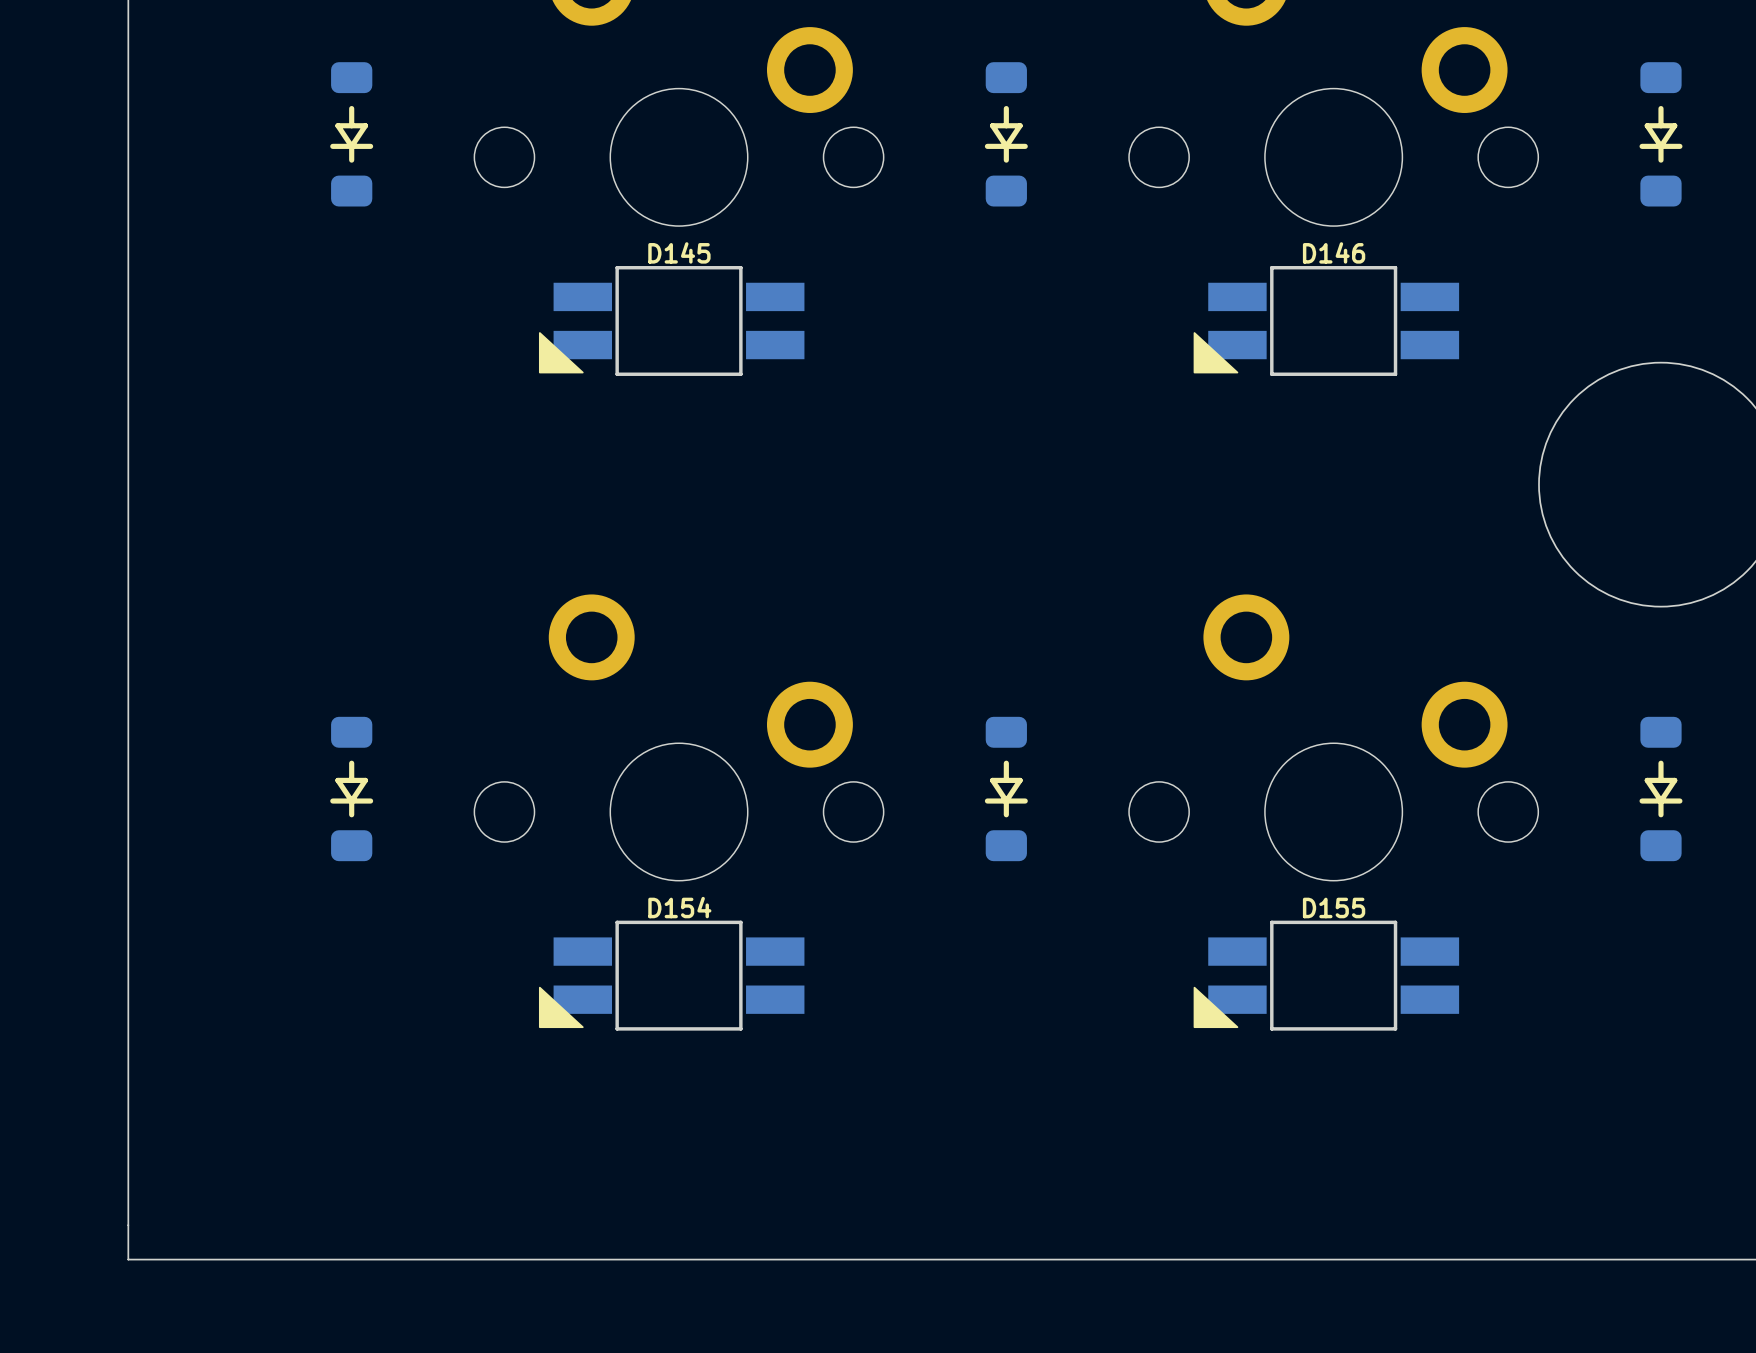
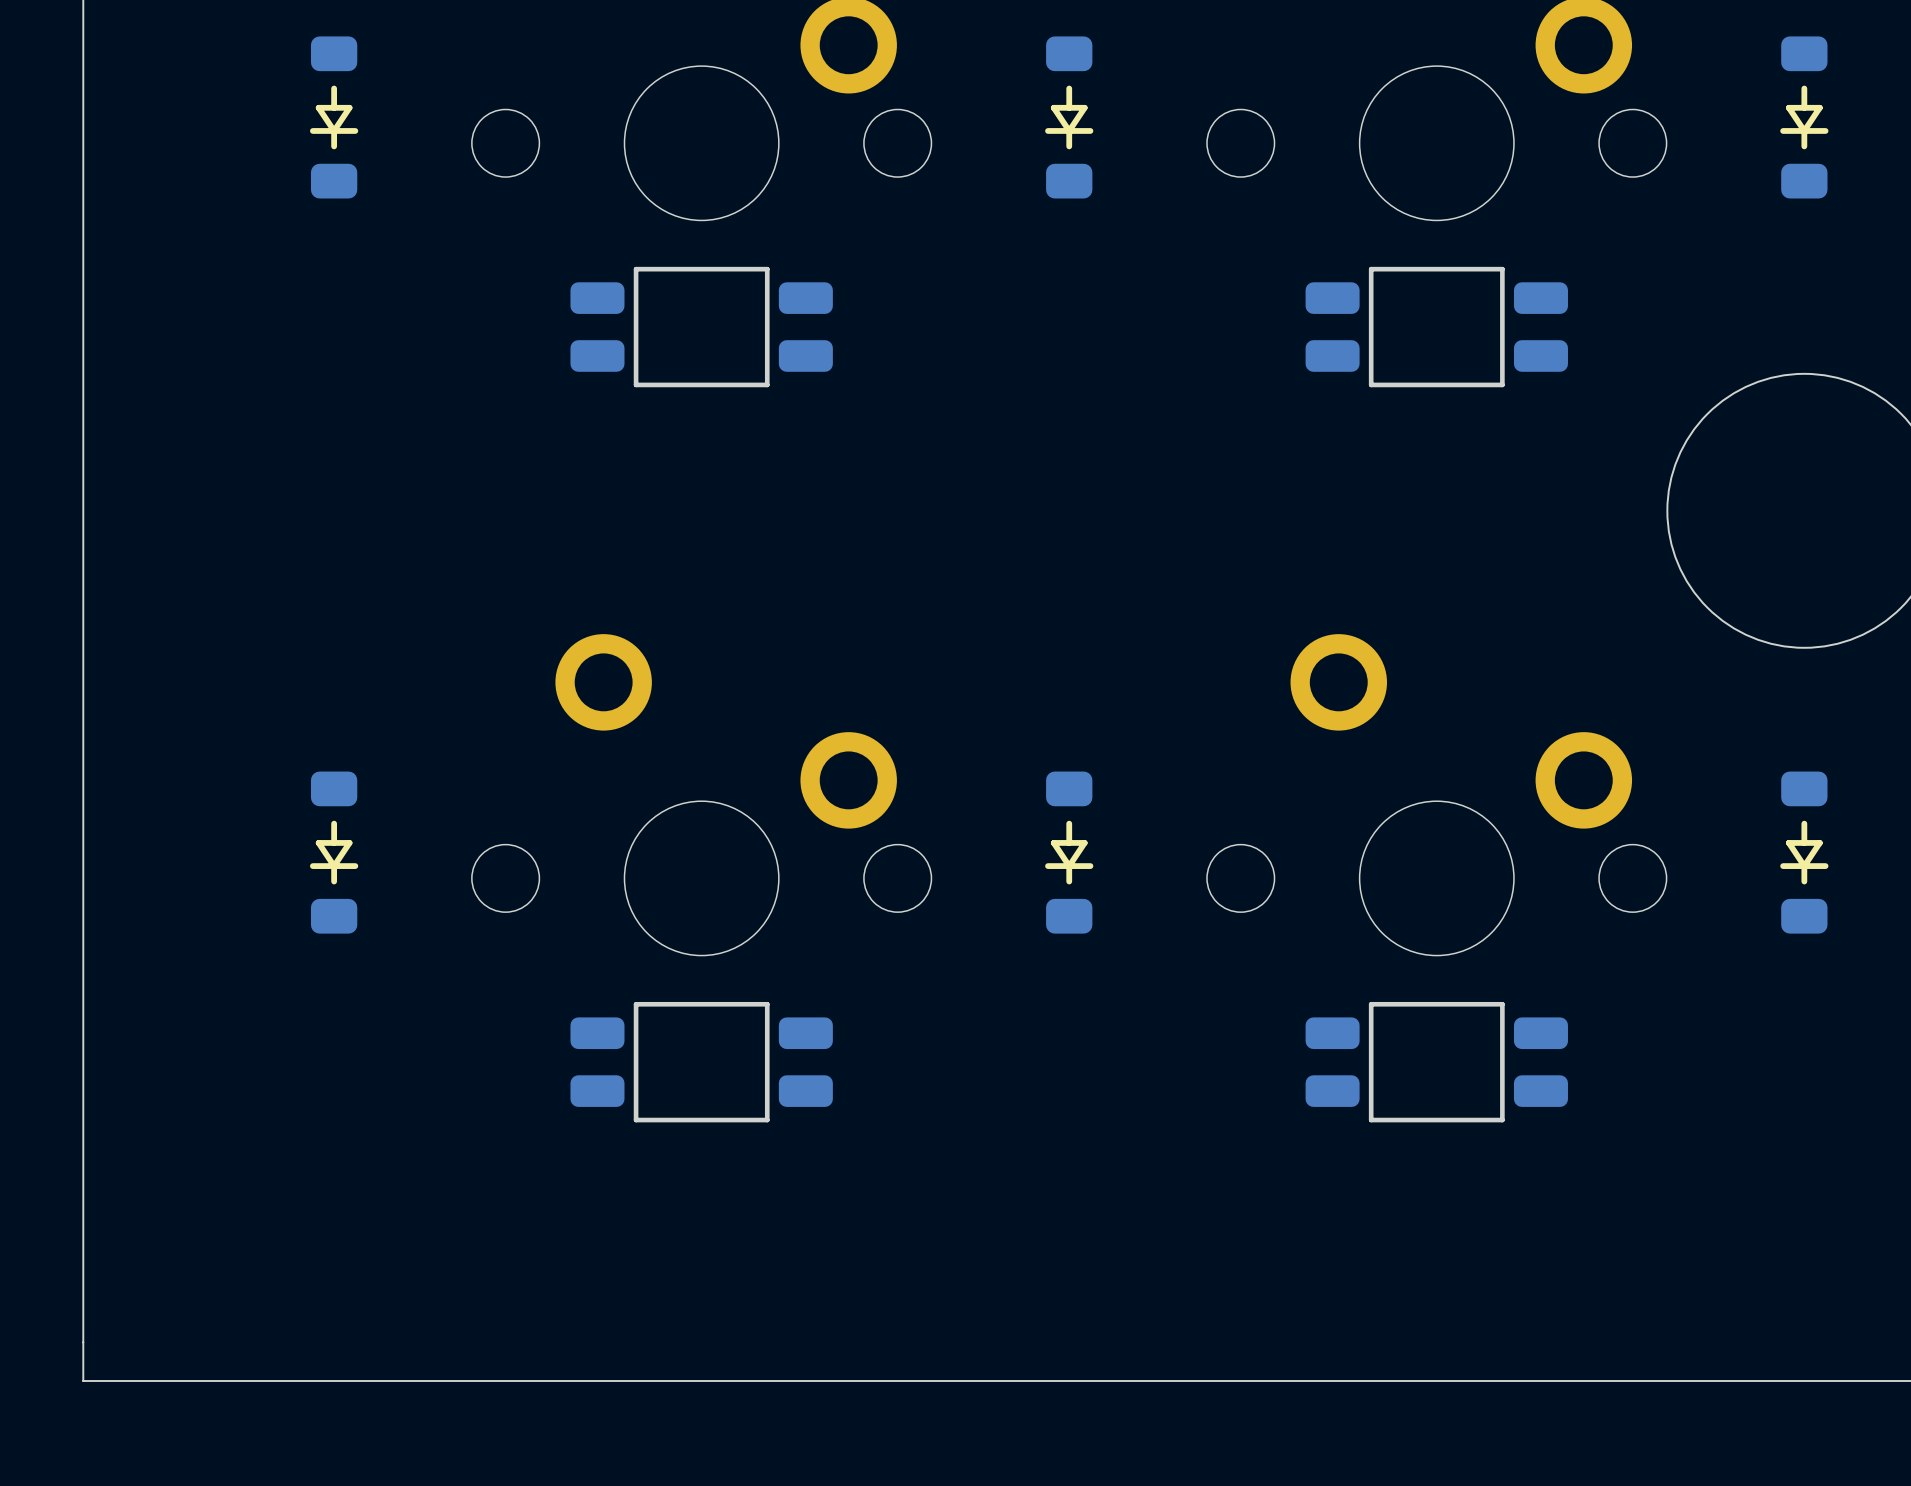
D145: (671, 320) -> none
part: none -> (701, 327)
D146: (1326, 320) -> none
part: none -> (1436, 327)
D154: (671, 975) -> none
part: none -> (701, 1062)
D155: (1326, 975) -> none
part: none -> (1436, 1062)

